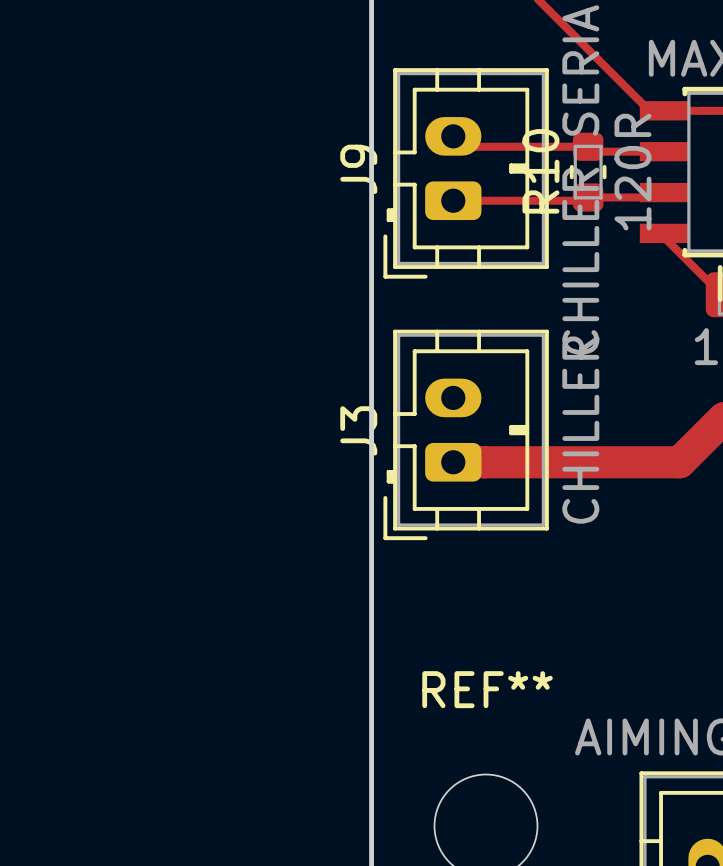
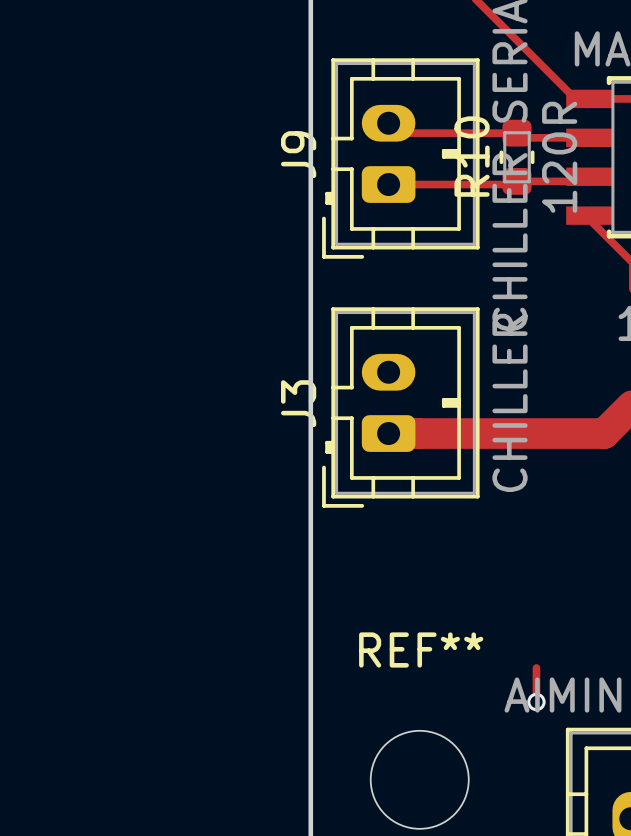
top track: none -> (536, 667) (536, 702)
via: none -> (536, 702)

